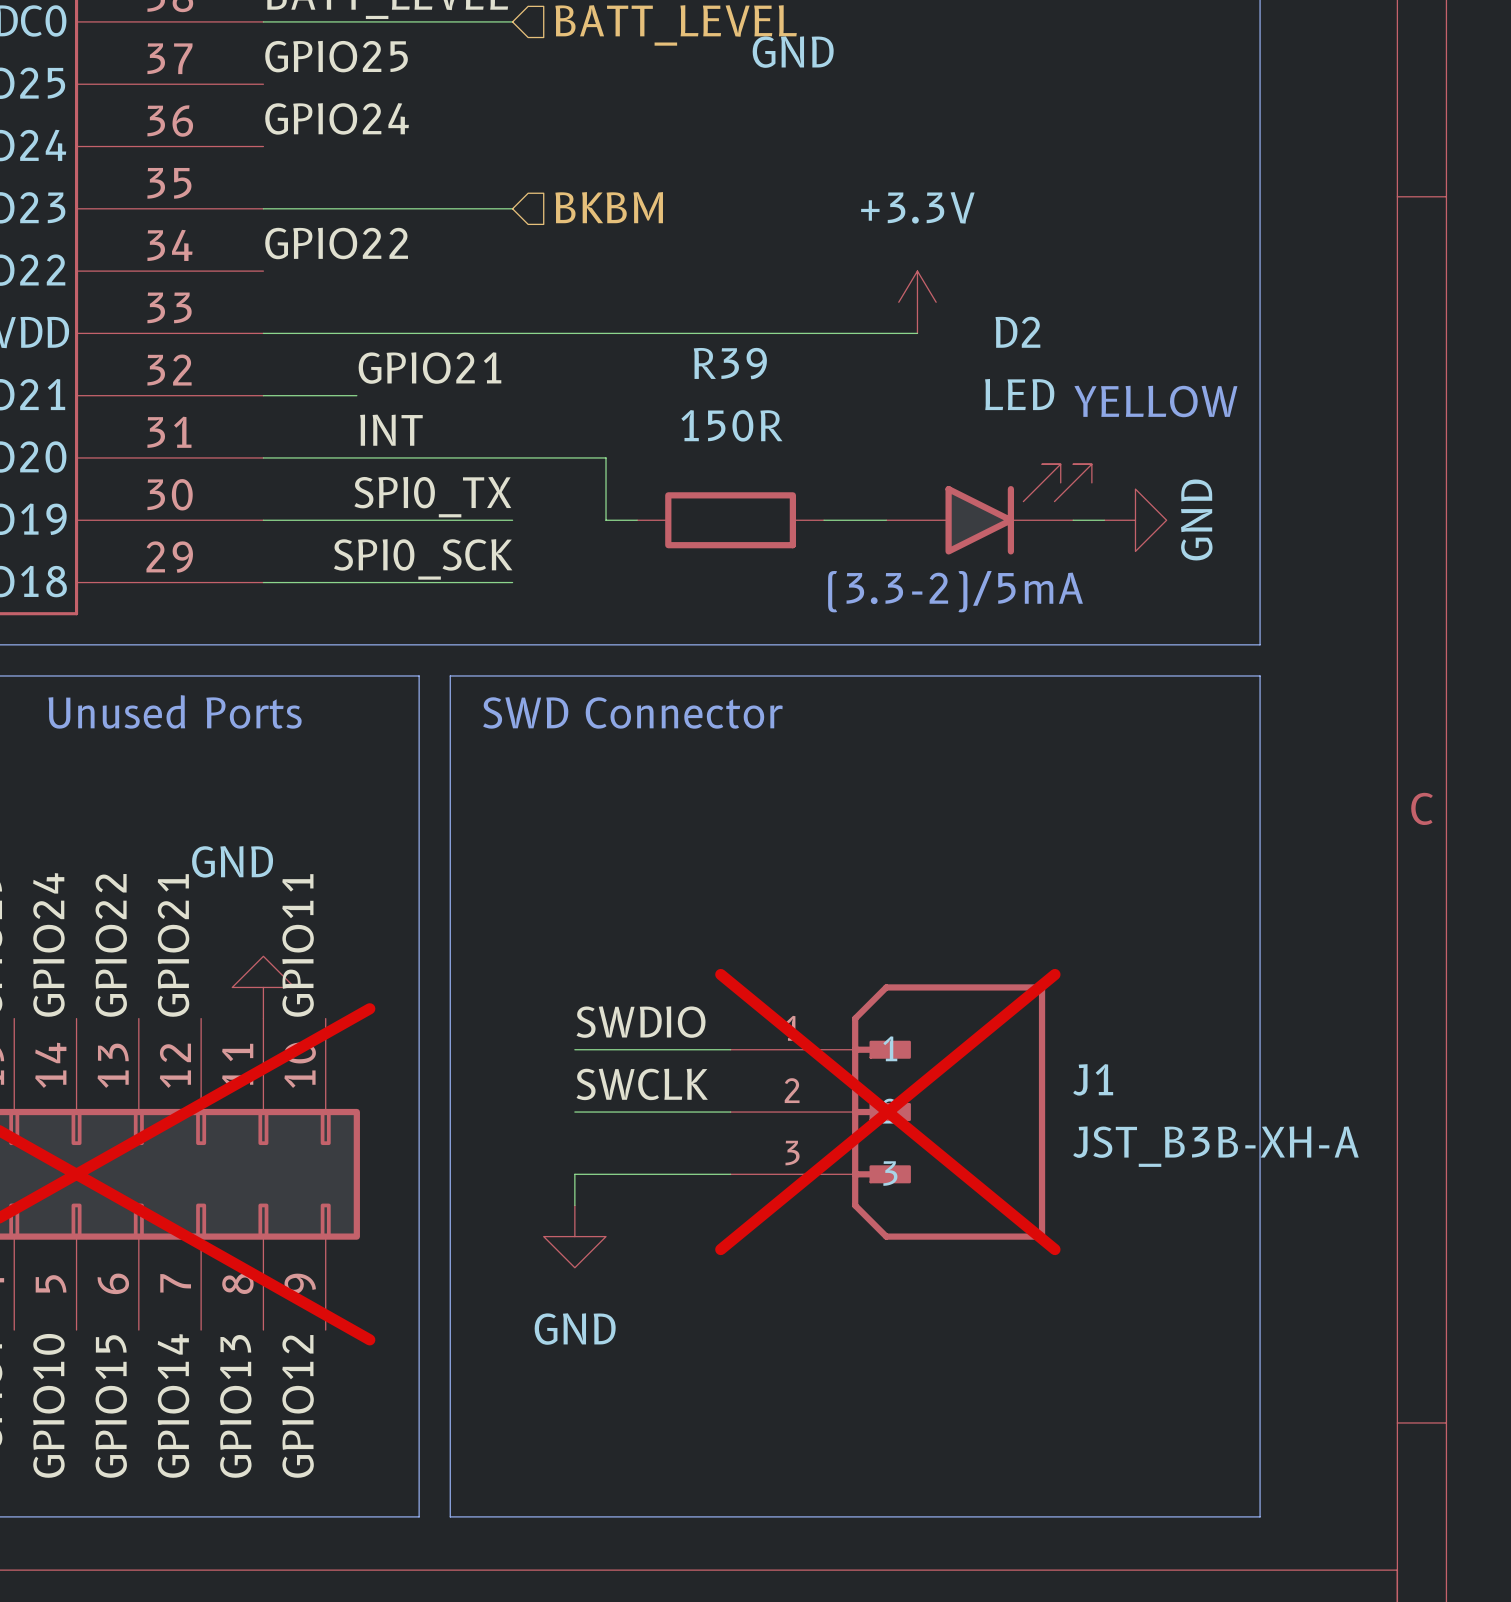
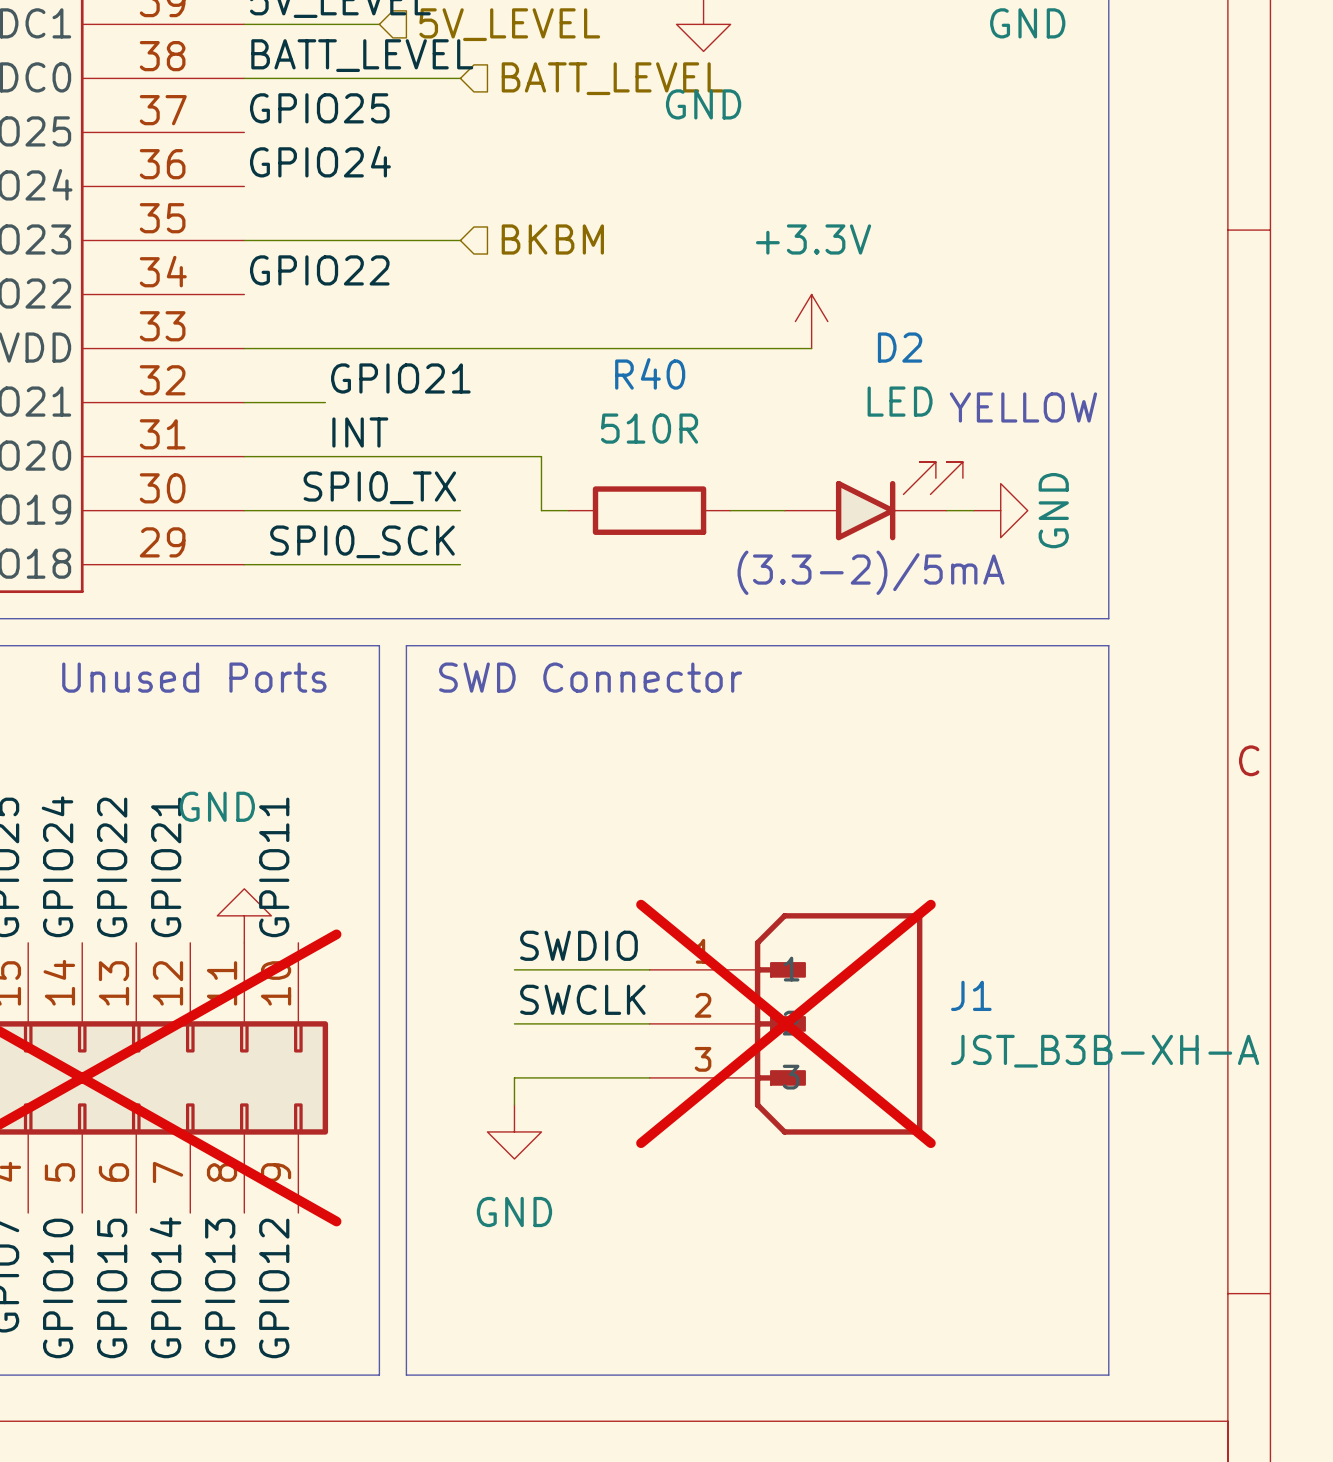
R39 name: R39 (730, 363) -> R40 (650, 373)
R39 value: 150R (731, 425) -> 510R (649, 428)

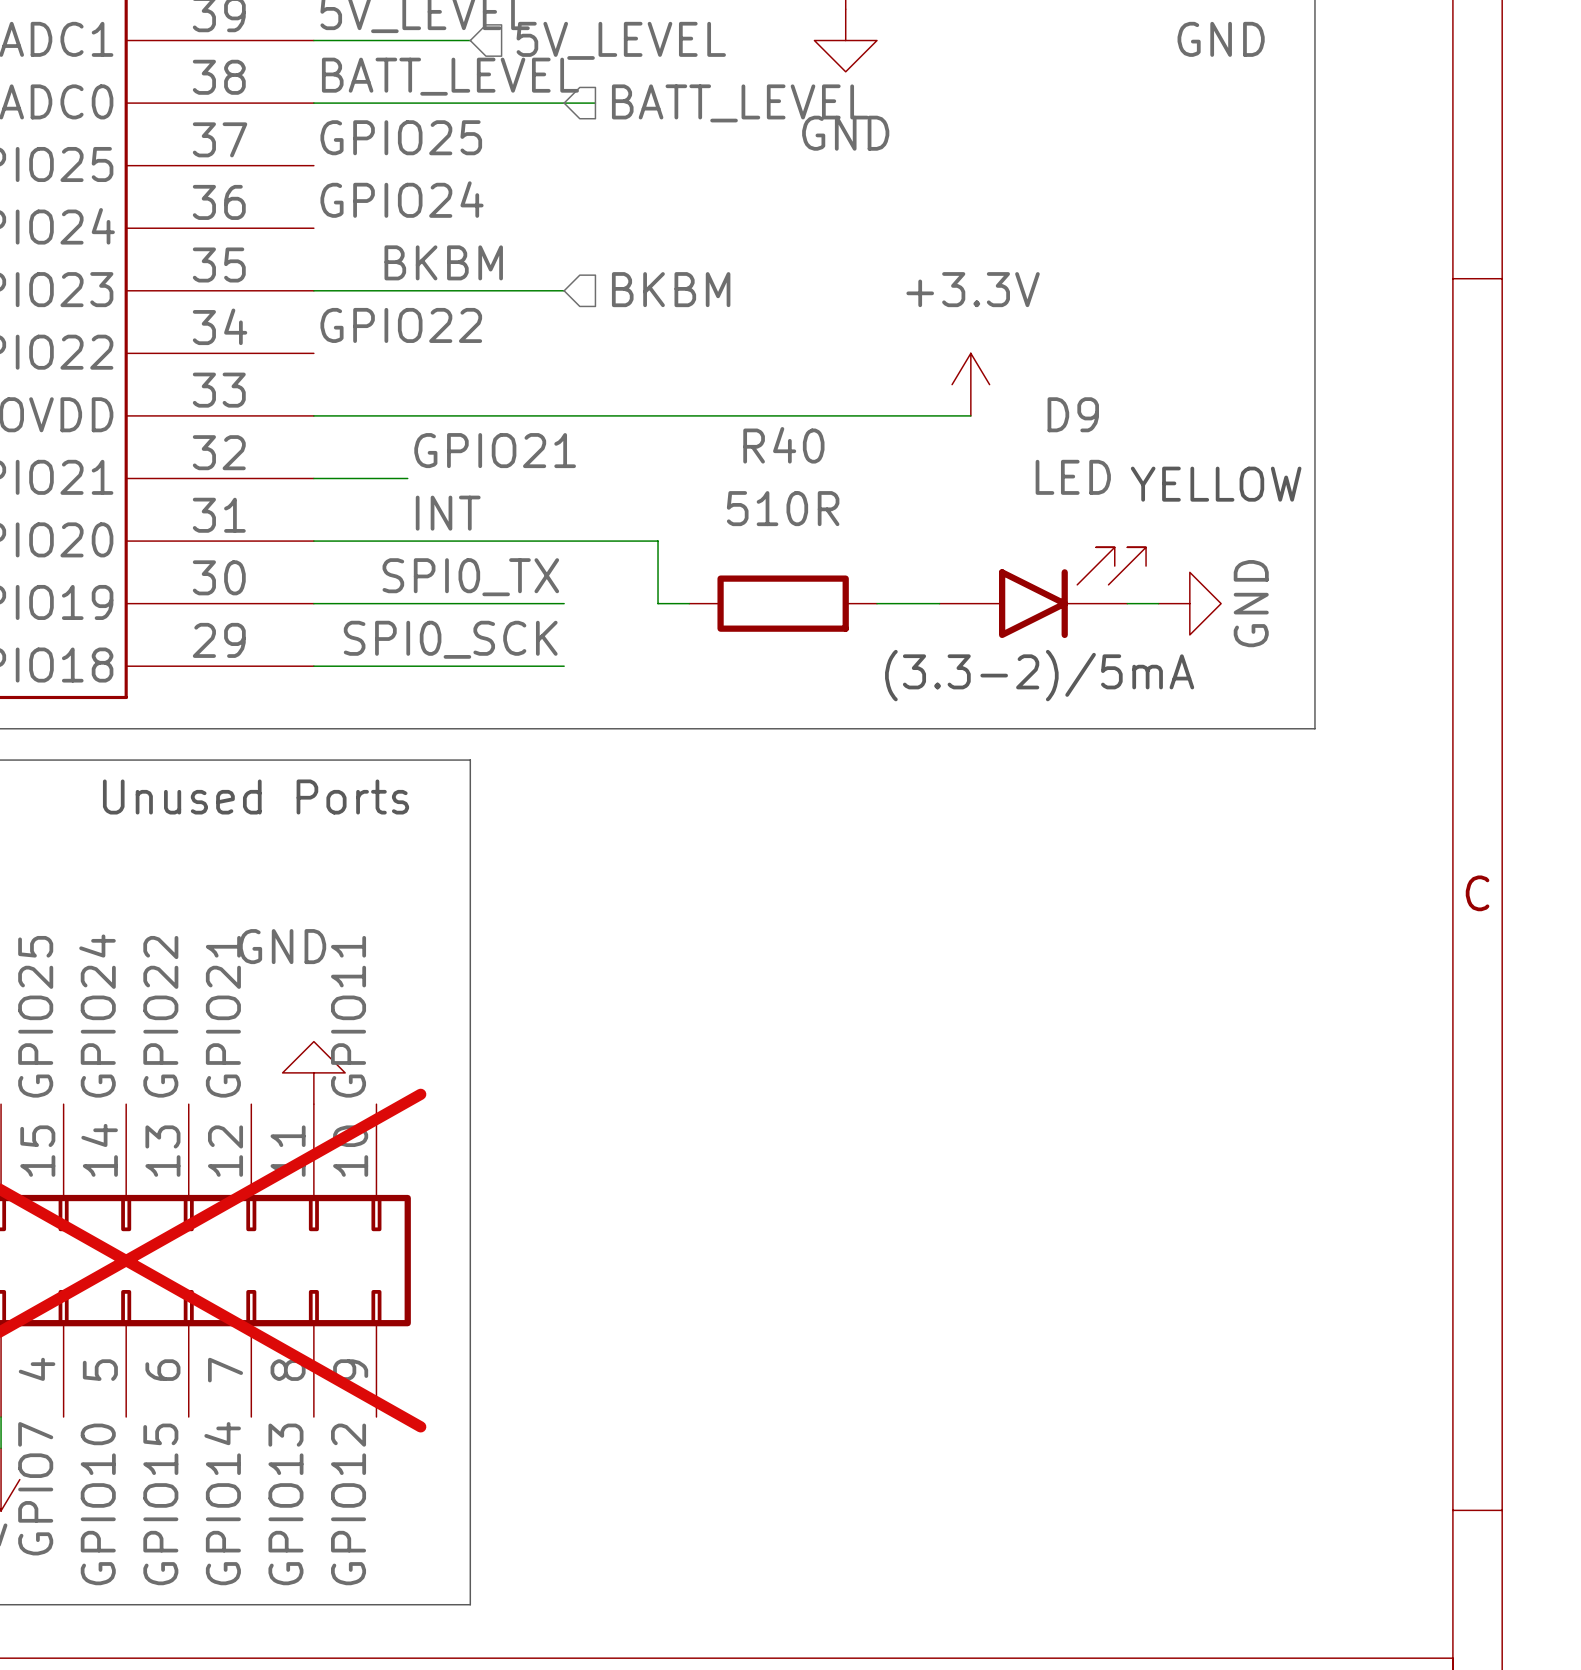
wire: none -> (564, 103) (595, 103)
label: none -> BKBM (443, 262)
D2 name: D2 (900, 347) -> D9 (1073, 414)
line: (406, 645) (1108, 645) (1108, 1375) (406, 1375) (406, 645) -> none
text: SWD Connector (590, 677) -> none
label: SWDIO (578, 945) -> none
wire: (514, 969) (649, 969) -> none
label: SWCLK (582, 999) -> none
wire: (514, 1023) (649, 1023) -> none
J1: JST_B3B-XH-A (785, 1023) -> none
wire: (649, 1077) (514, 1077) (514, 1104) -> none
power symbol: GND (514, 1131) -> none

